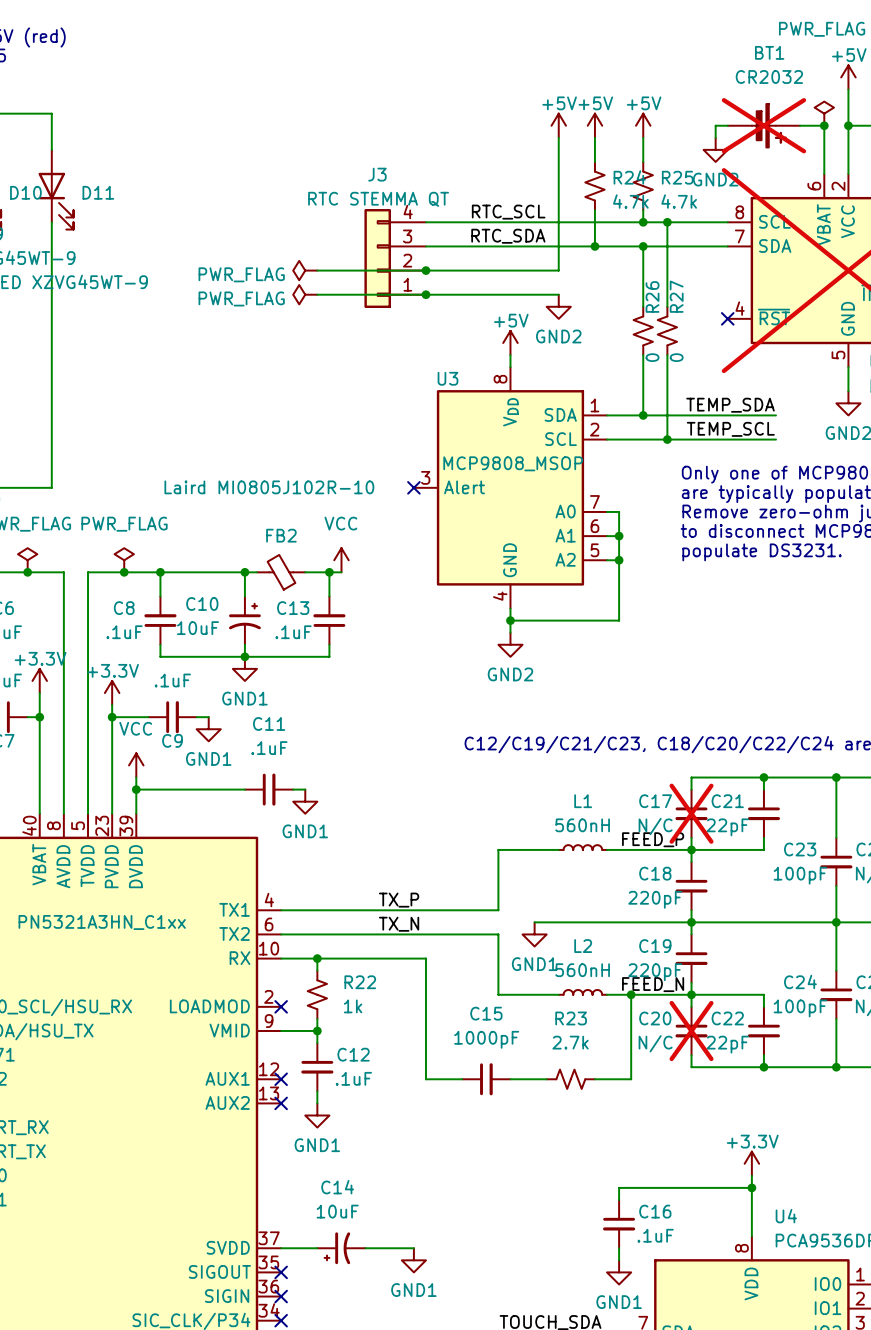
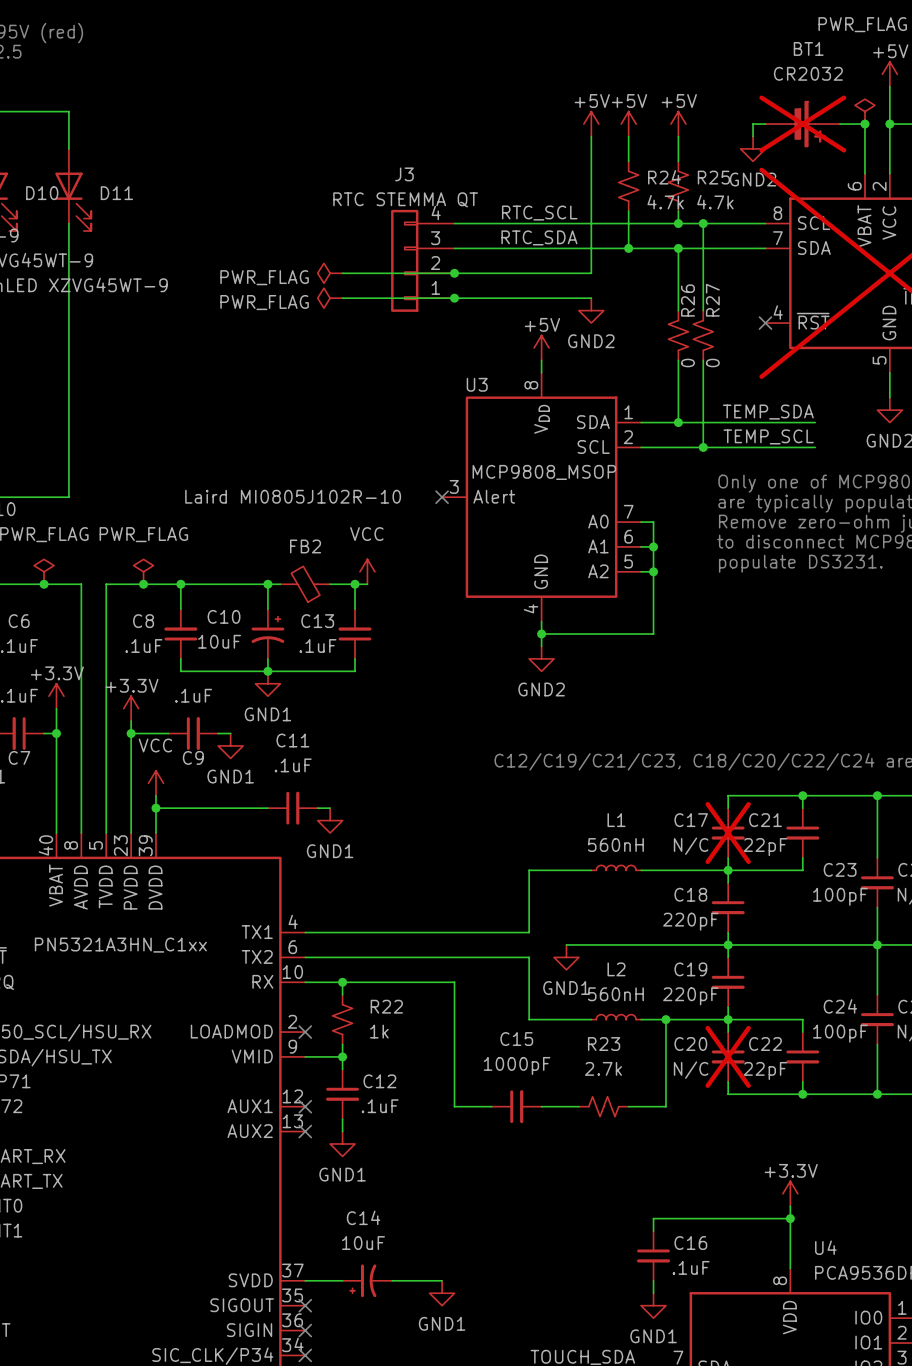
label: FEED_P (653, 839) -> none
label: TX_P (399, 900) -> none
label: TX_N (399, 924) -> none
label: FEED_N (653, 984) -> none

